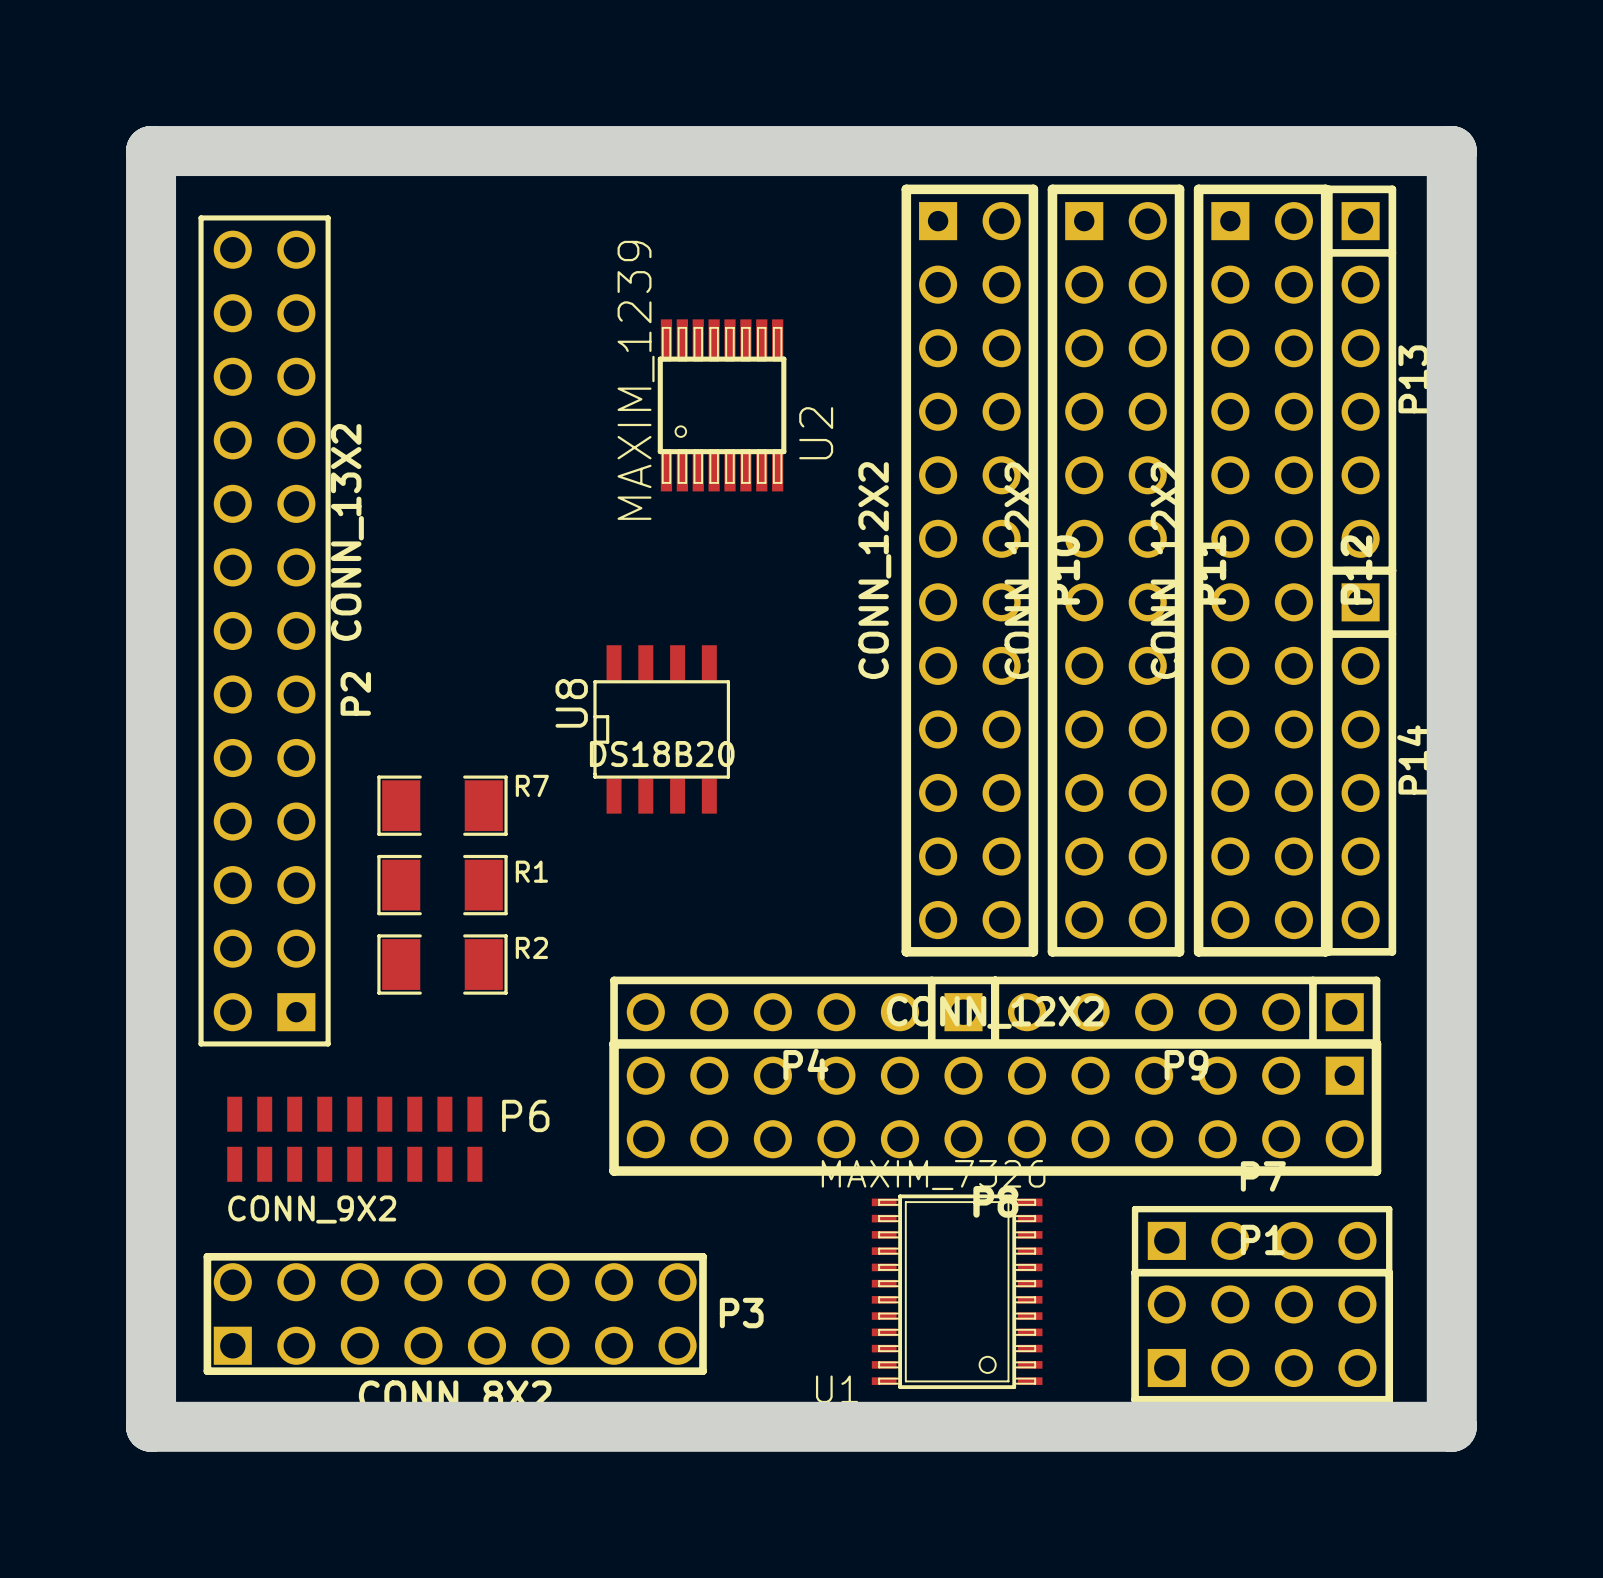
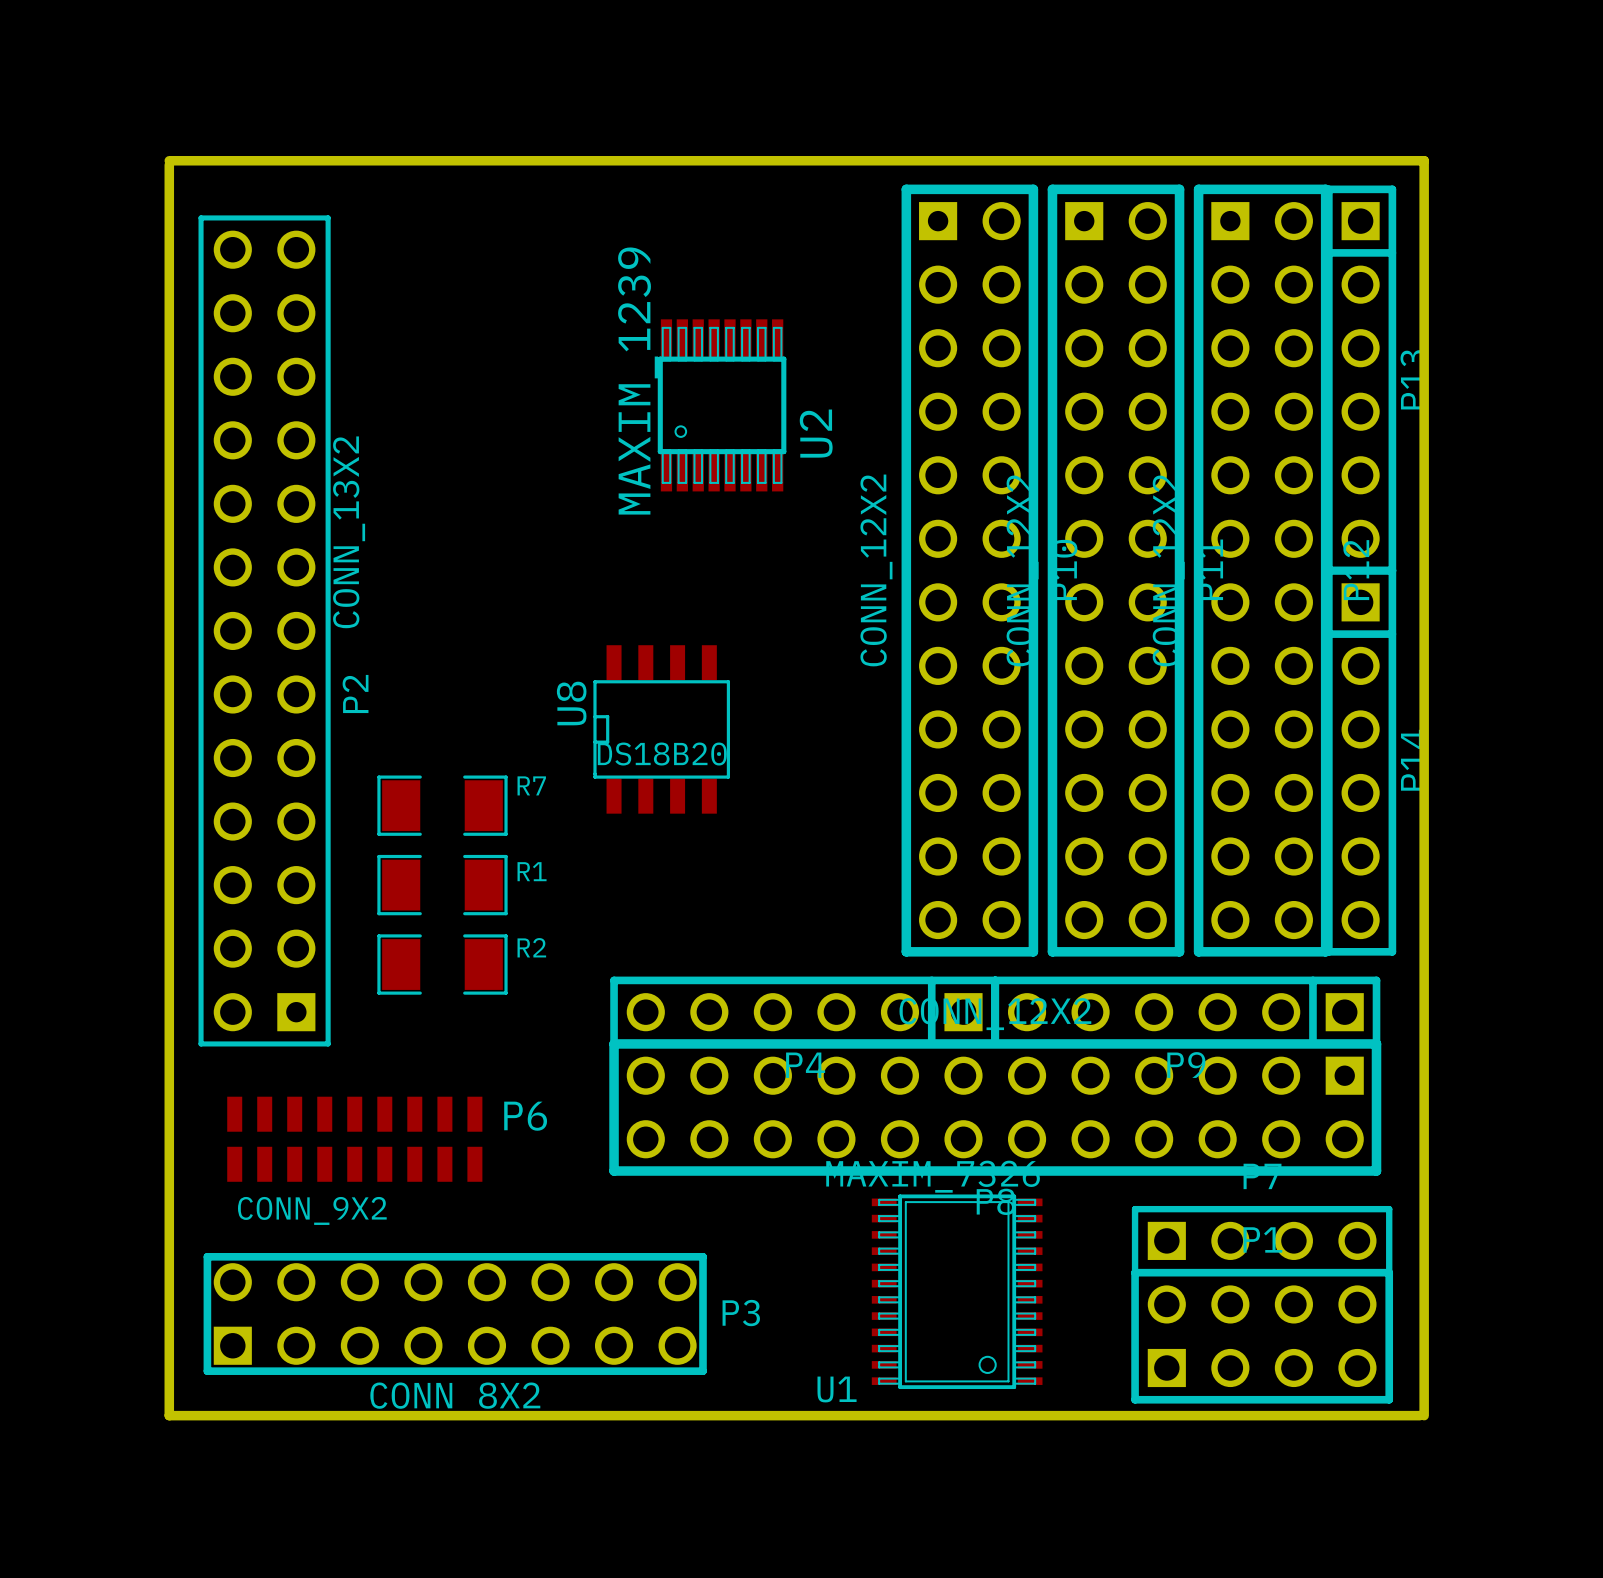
board edge: (151, 151) (151, 1426) (1451, 1426) (1451, 151) (151, 151) -> none
board edge: none -> (169, 160) (1424, 160) (1424, 1415)
board edge: none -> (169, 164) (169, 1415) (1420, 1415)

